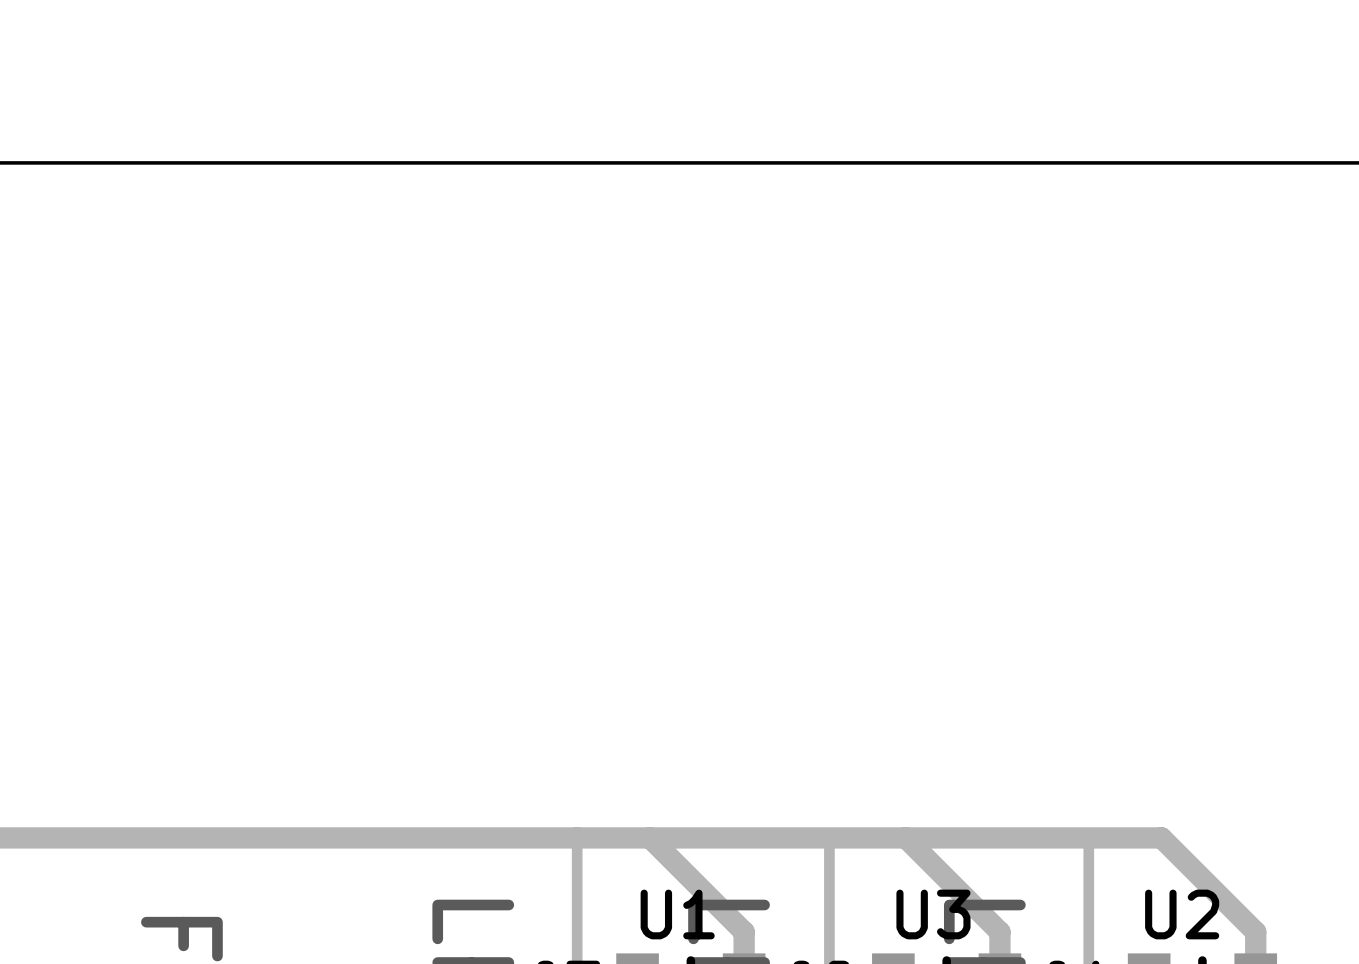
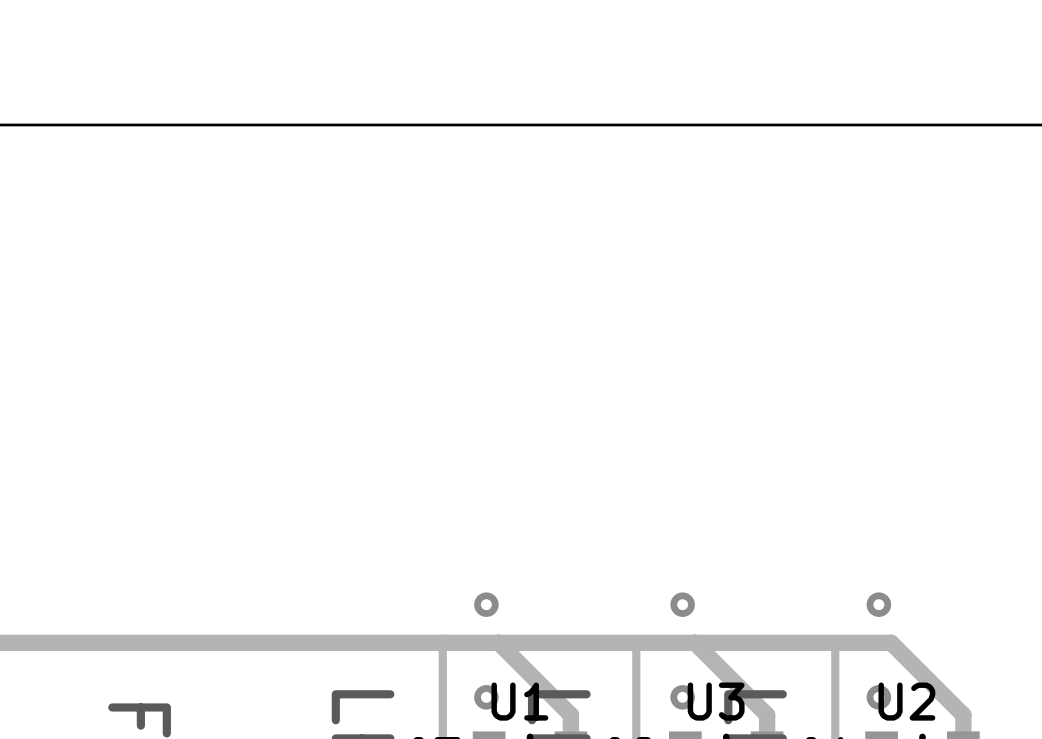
via: none -> (486, 604)
via: none -> (682, 604)
via: none -> (878, 604)
via: none -> (486, 697)
via: none -> (682, 697)
via: none -> (878, 697)

